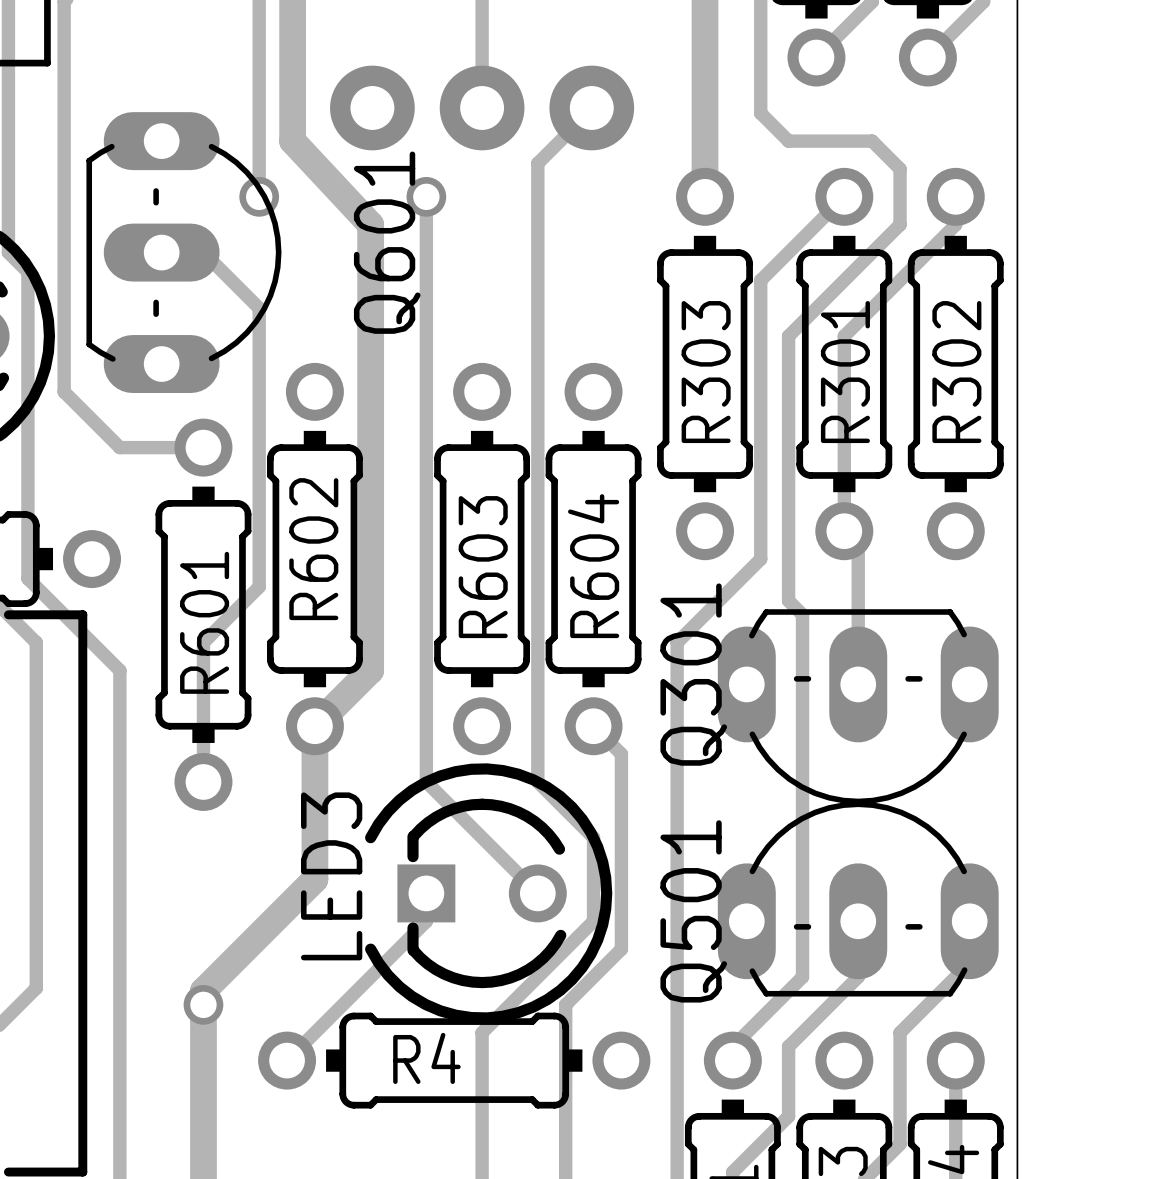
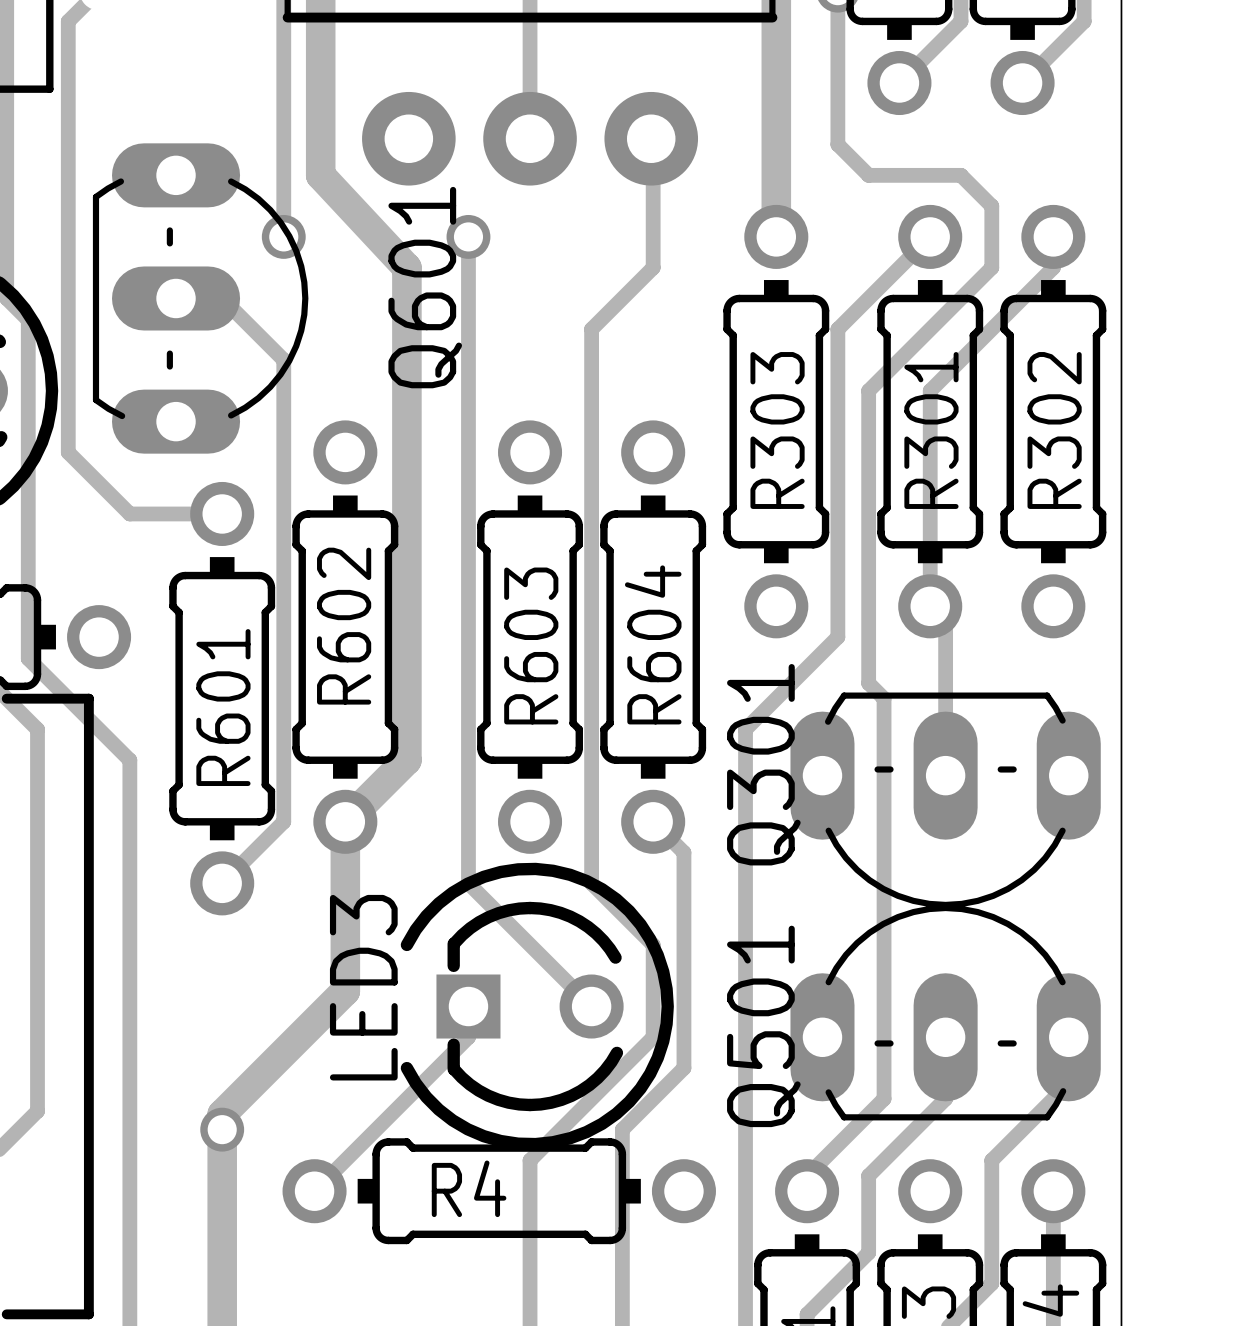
track: (592, 108) (537, 163) (537, 280) -> (652, 139) (653, 267) (591, 329)
track: (259, 586) (203, 642) (203, 781) -> (283, 667) (283, 821) (222, 883)

